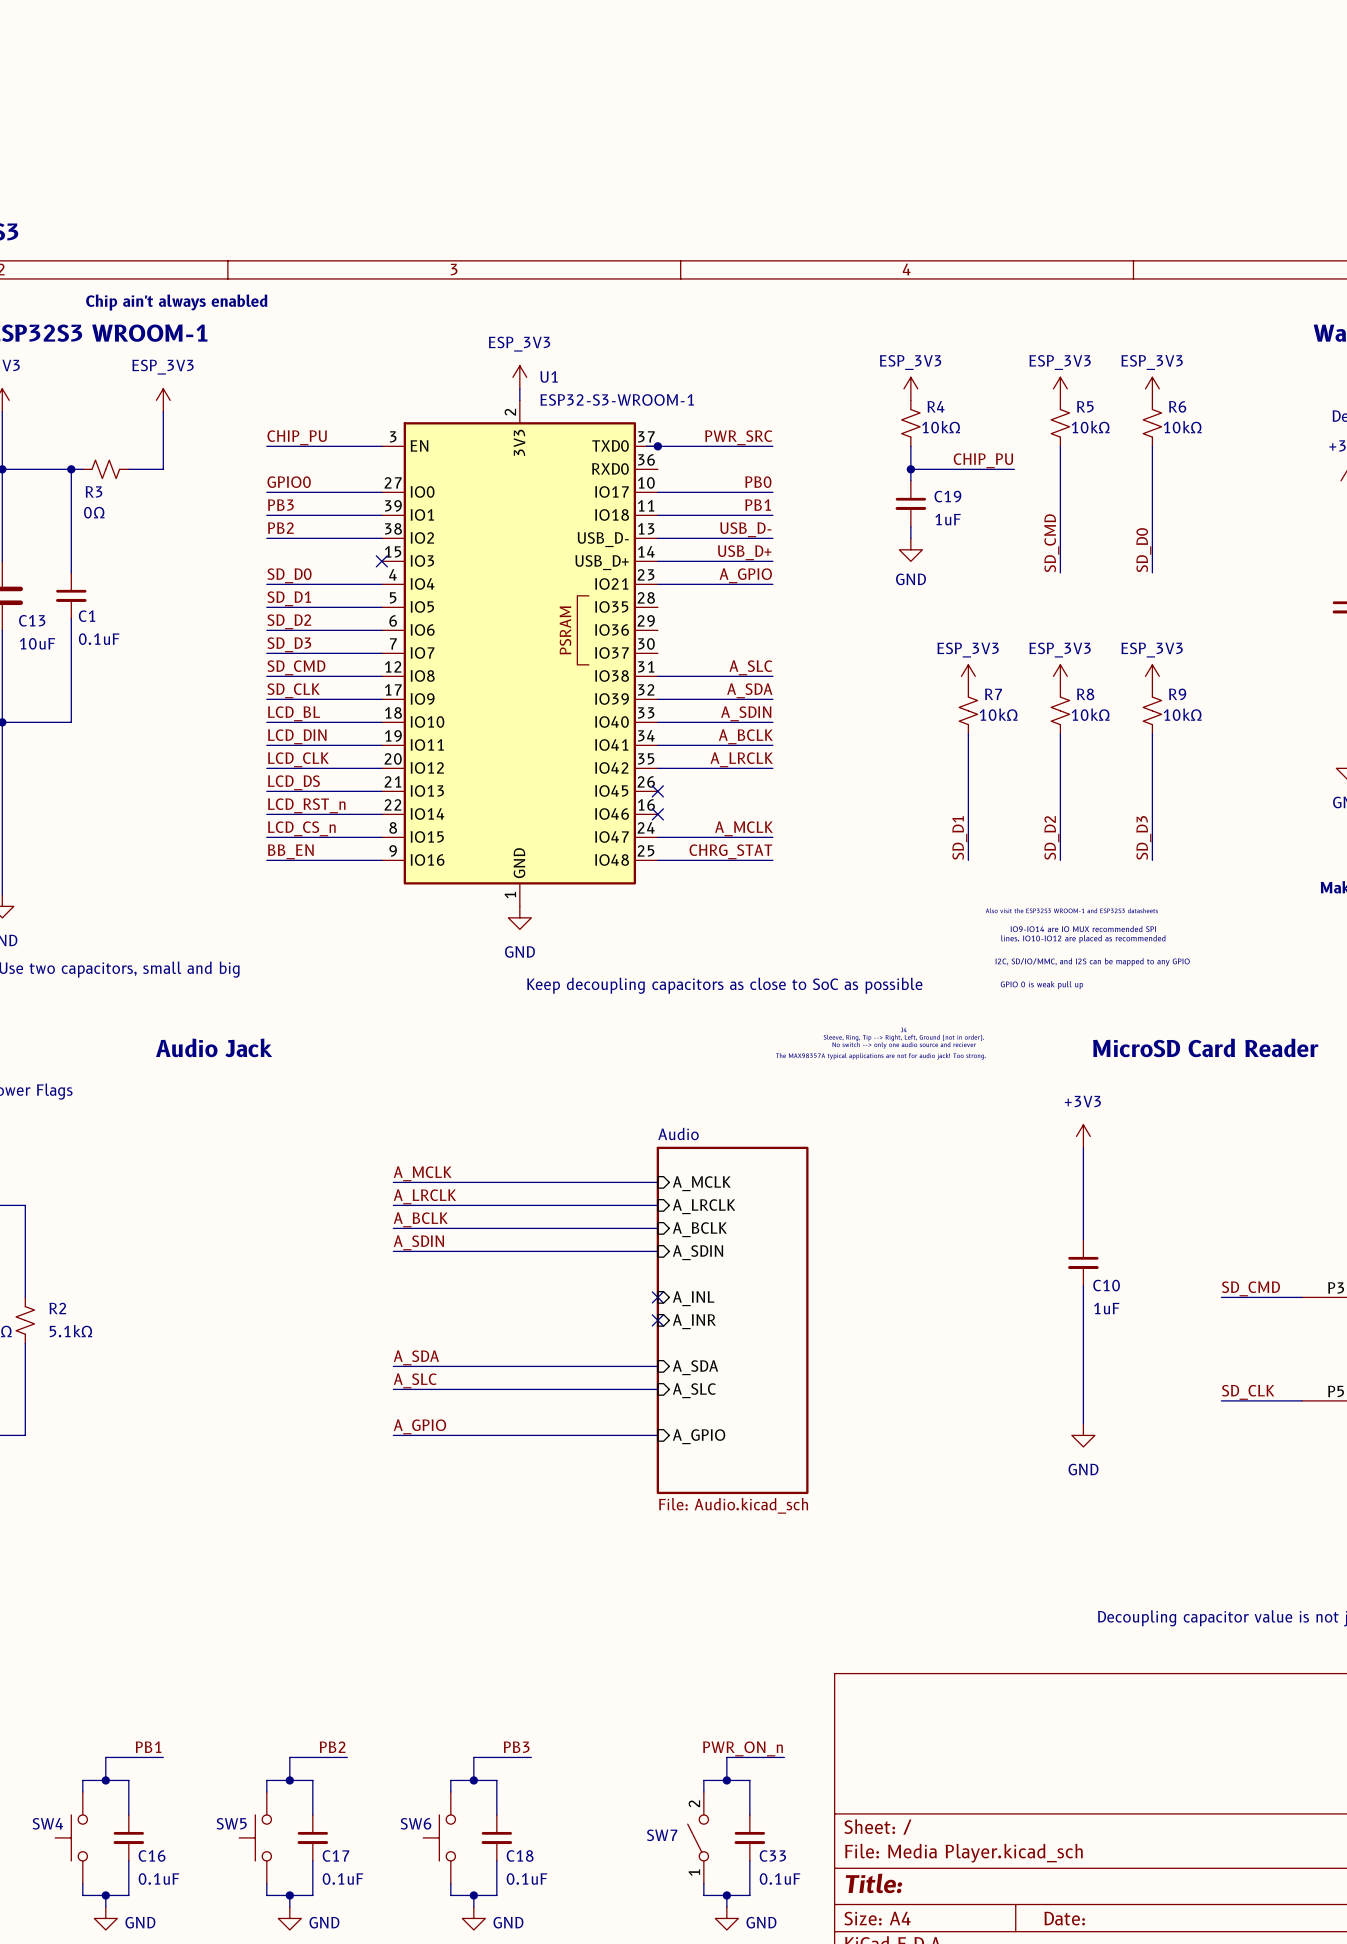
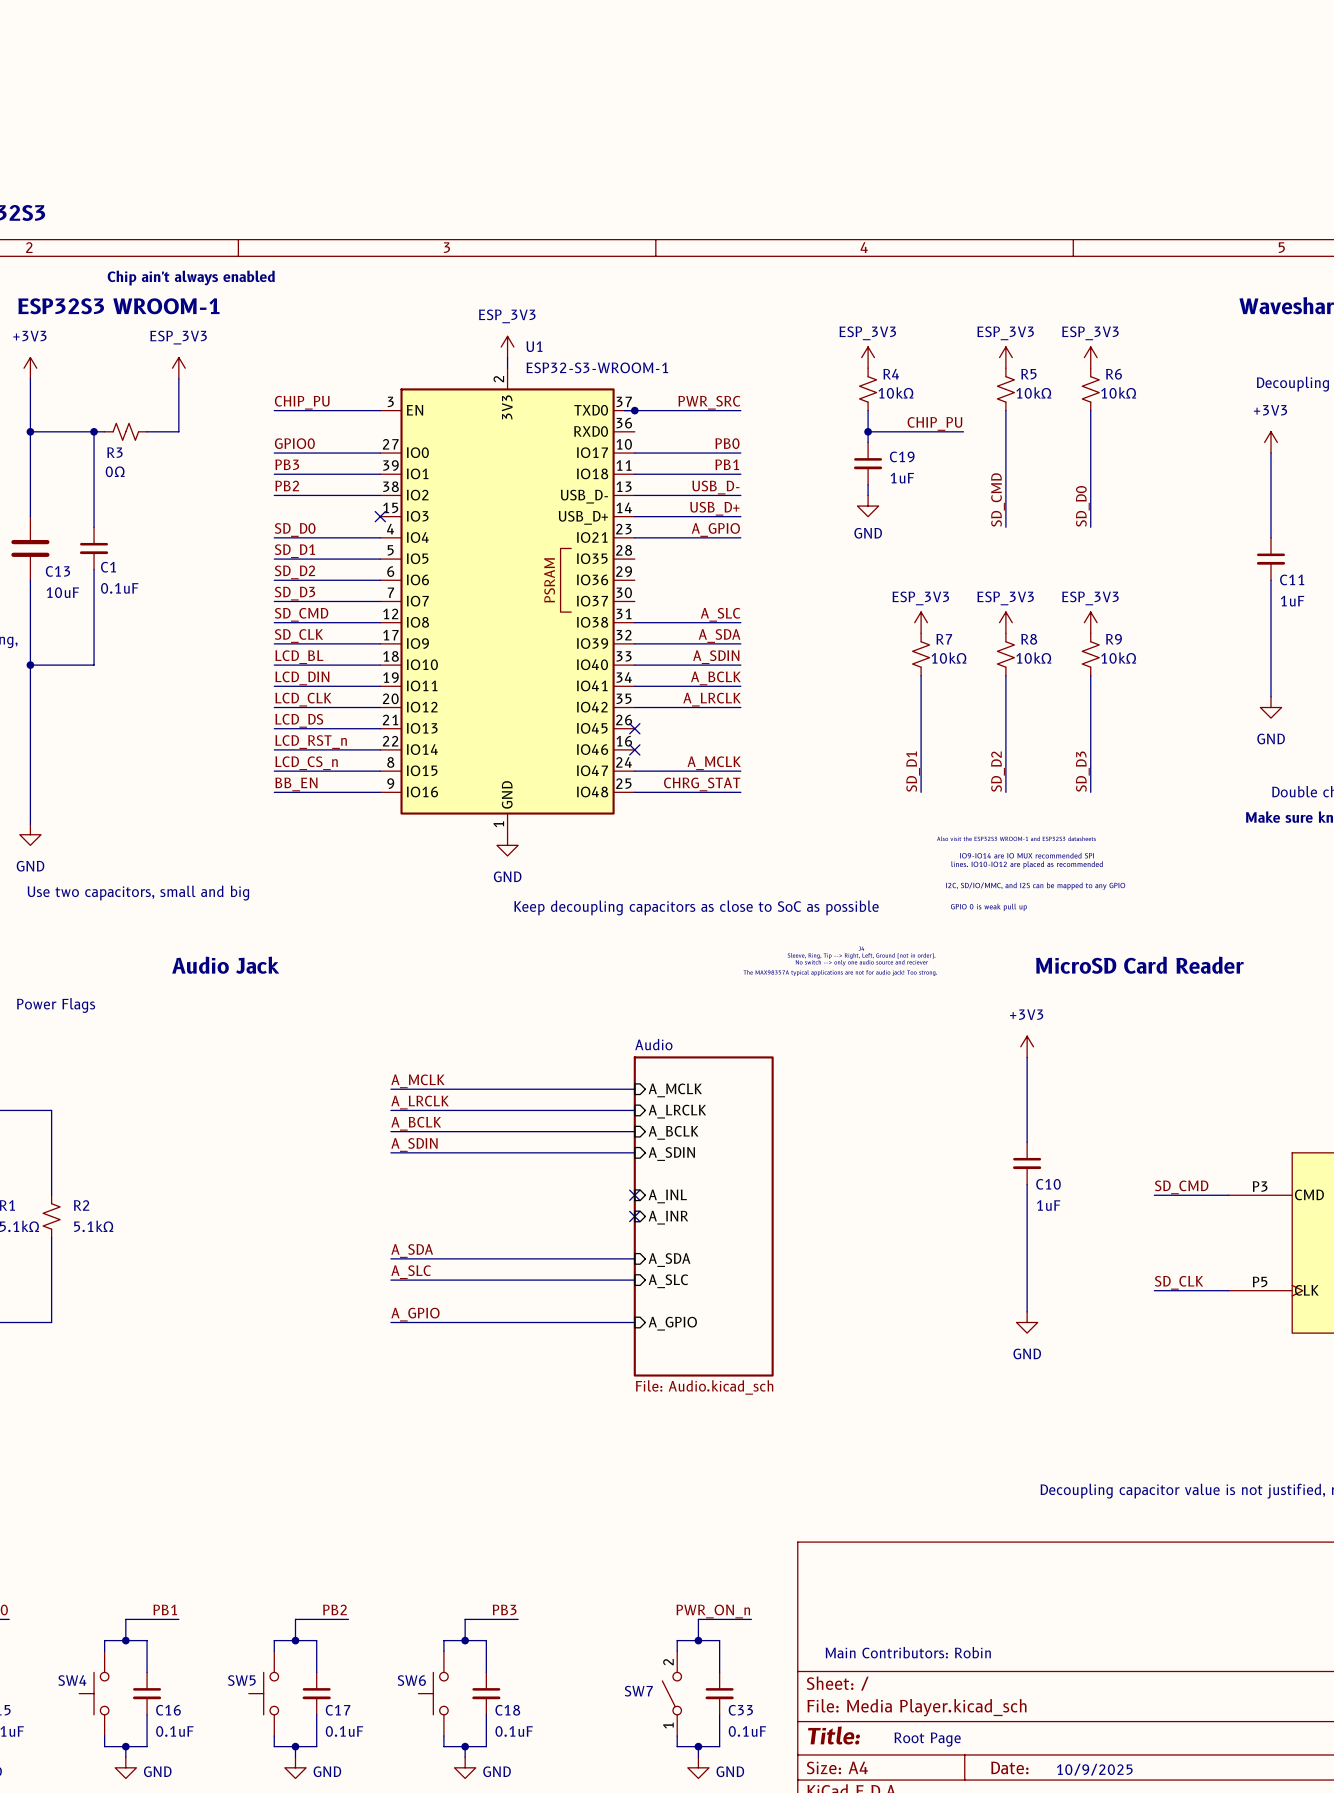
text: none -> Main Contributors: Robin (908, 1652)
text: none -> Root Page (927, 1739)
text: none -> 10/9/2025 (1094, 1769)

